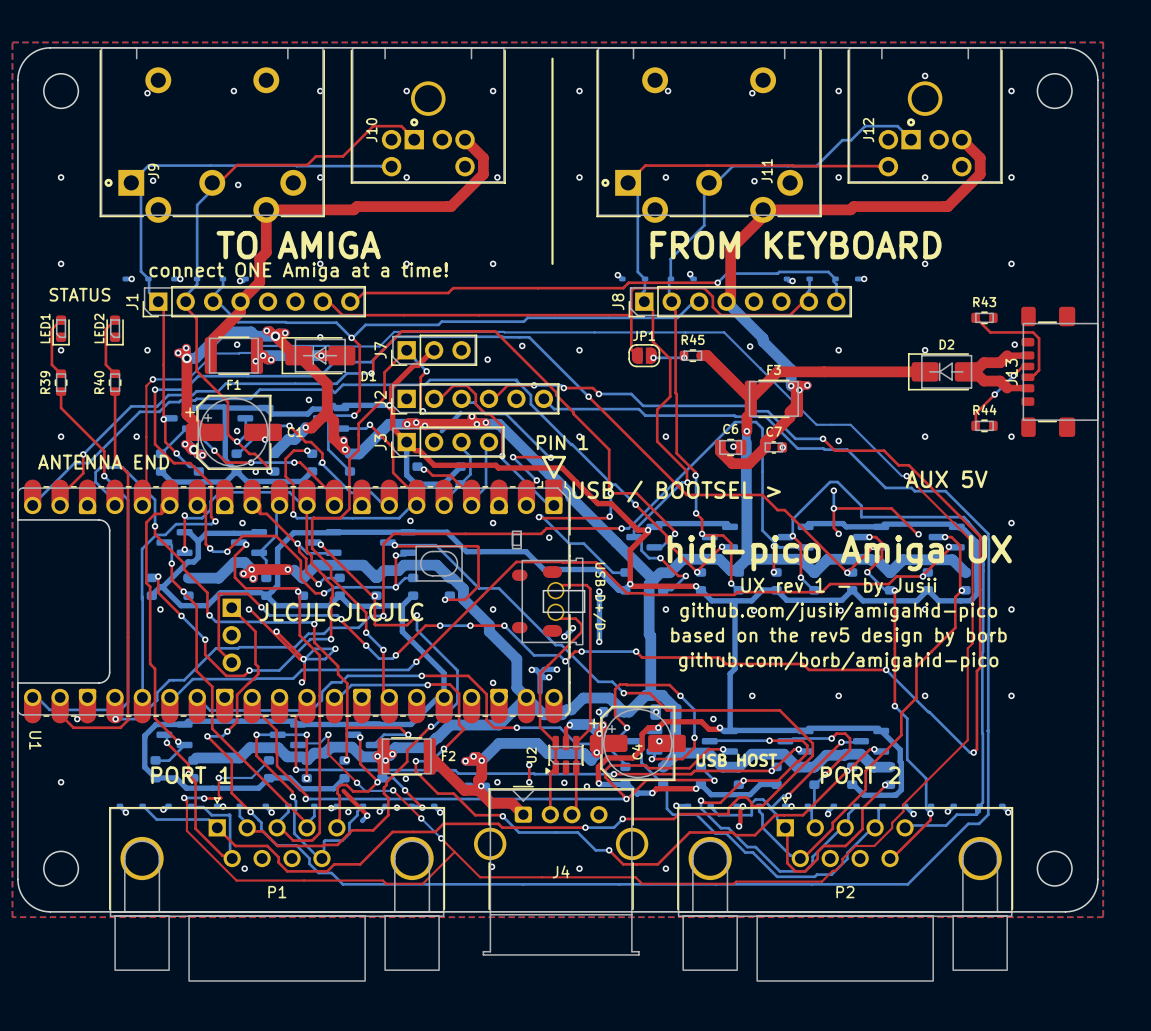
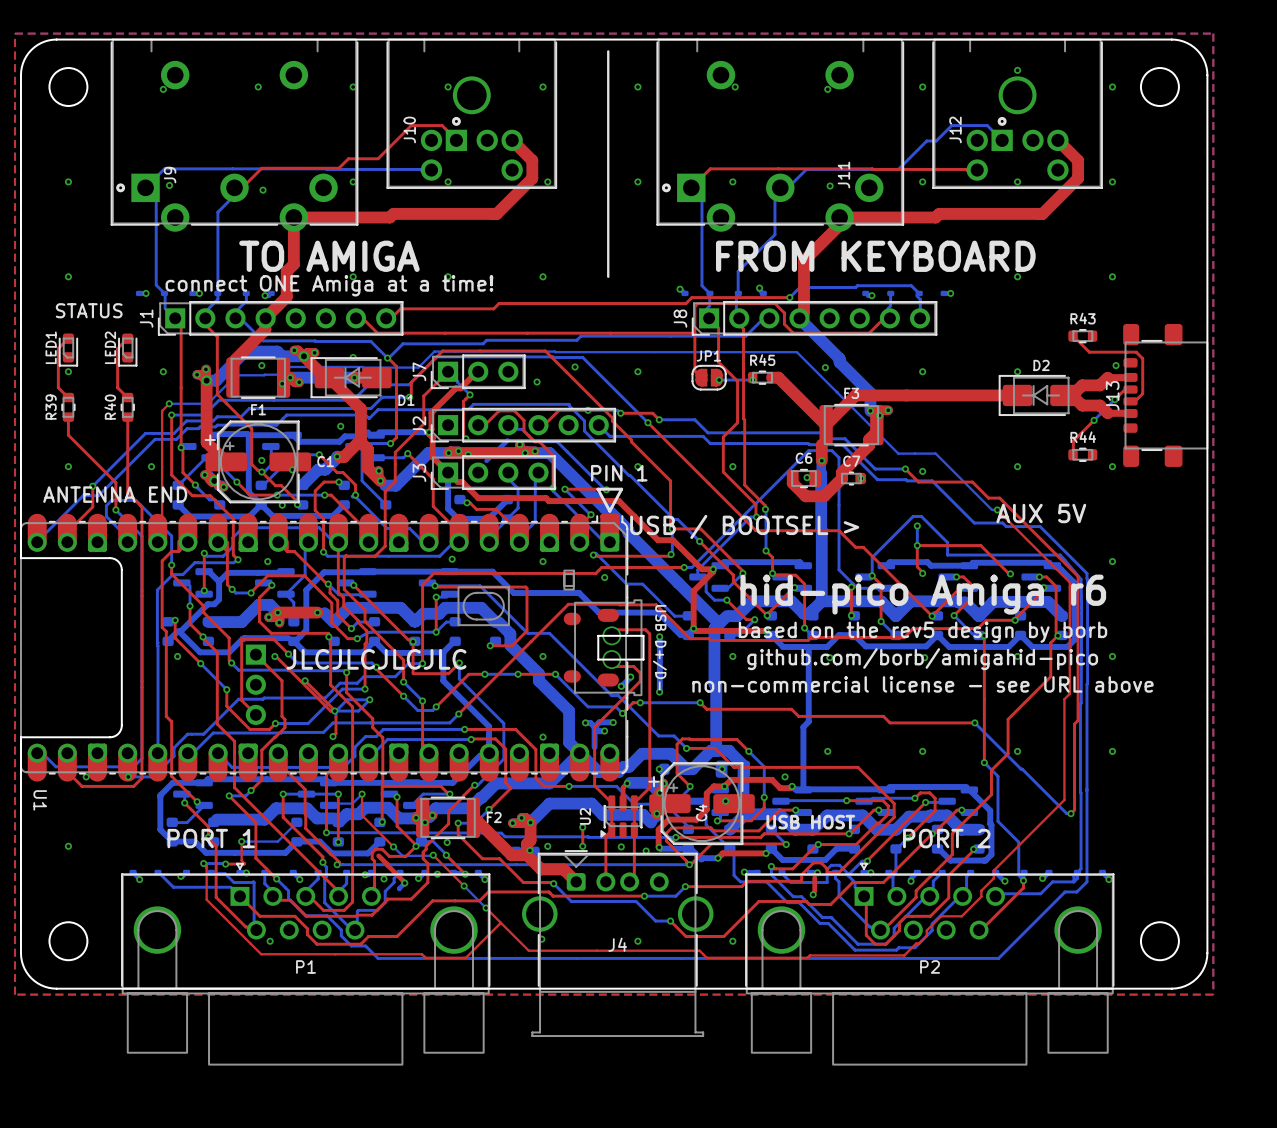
text: hid-pico Amiga UX (839, 553) -> hid-pico Amiga r6 (923, 594)
text: UX rev 1 - by Jusii (839, 587) -> based on the rev5 design by borb (922, 632)
text: github.com/jusii/amigahid-pico (838, 611) -> github.com/borb/amigahid-pico (922, 659)
text: based on the rev5 design by borb (839, 637) -> non-commercial license - see URL above (922, 684)
text: github.com/borb/amigahid-pico (838, 661) -> none

